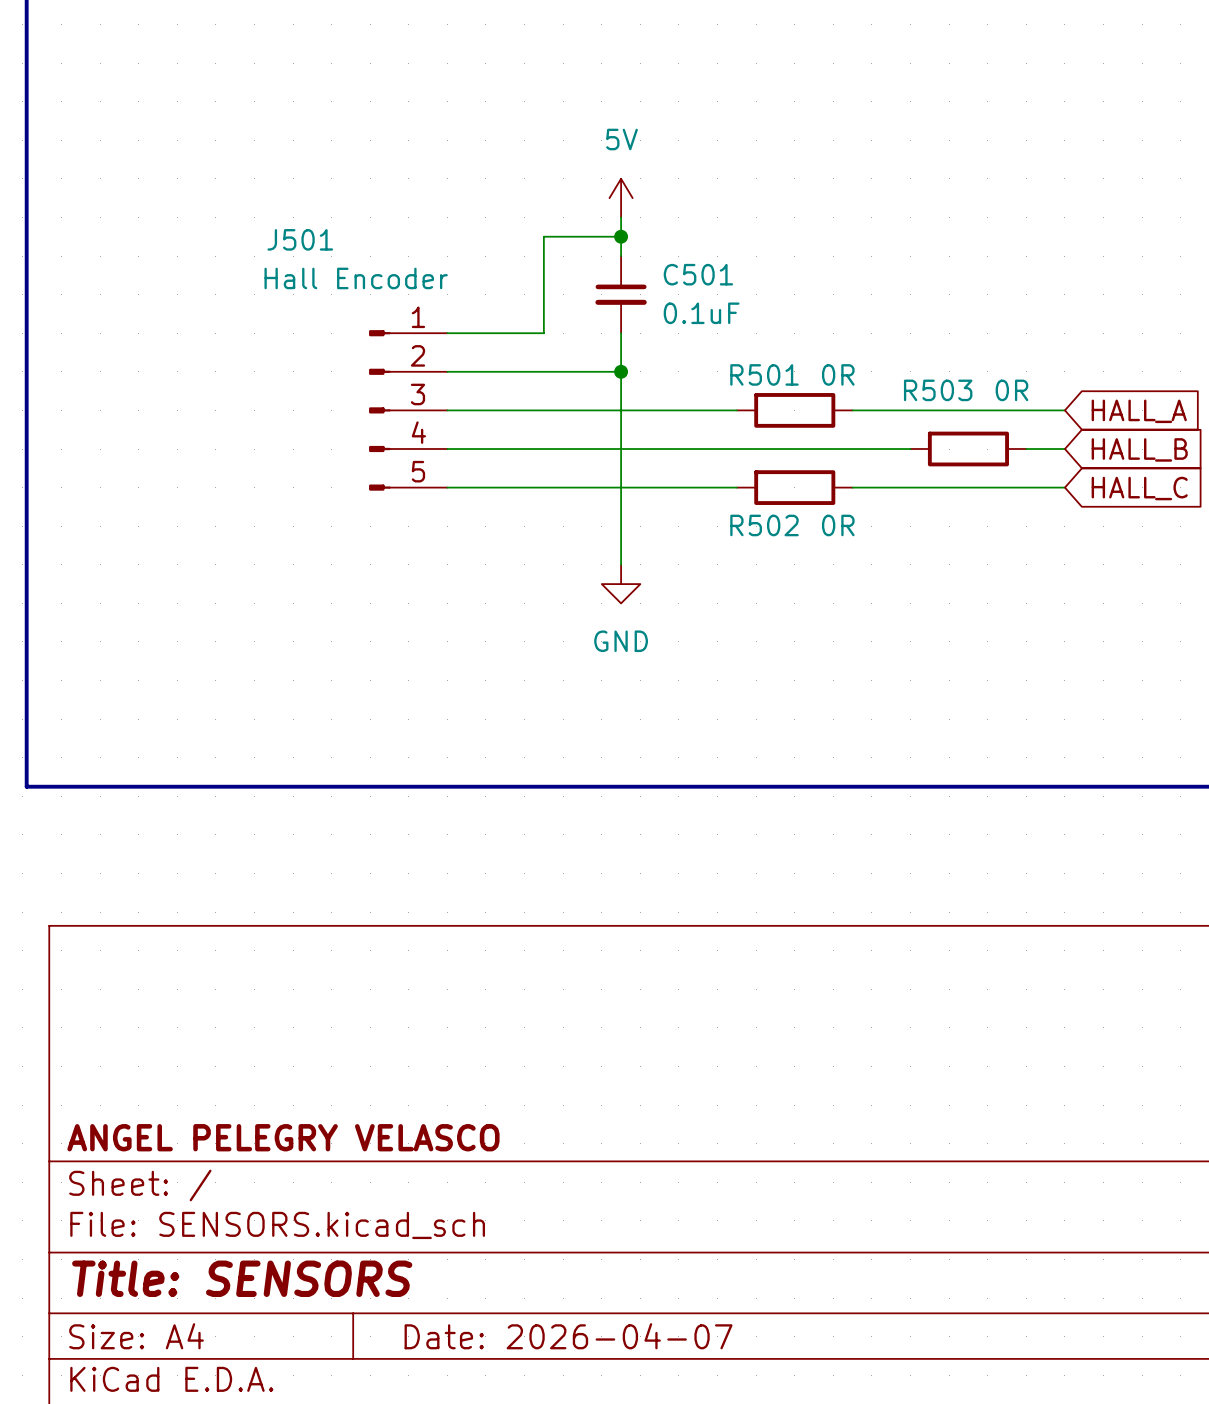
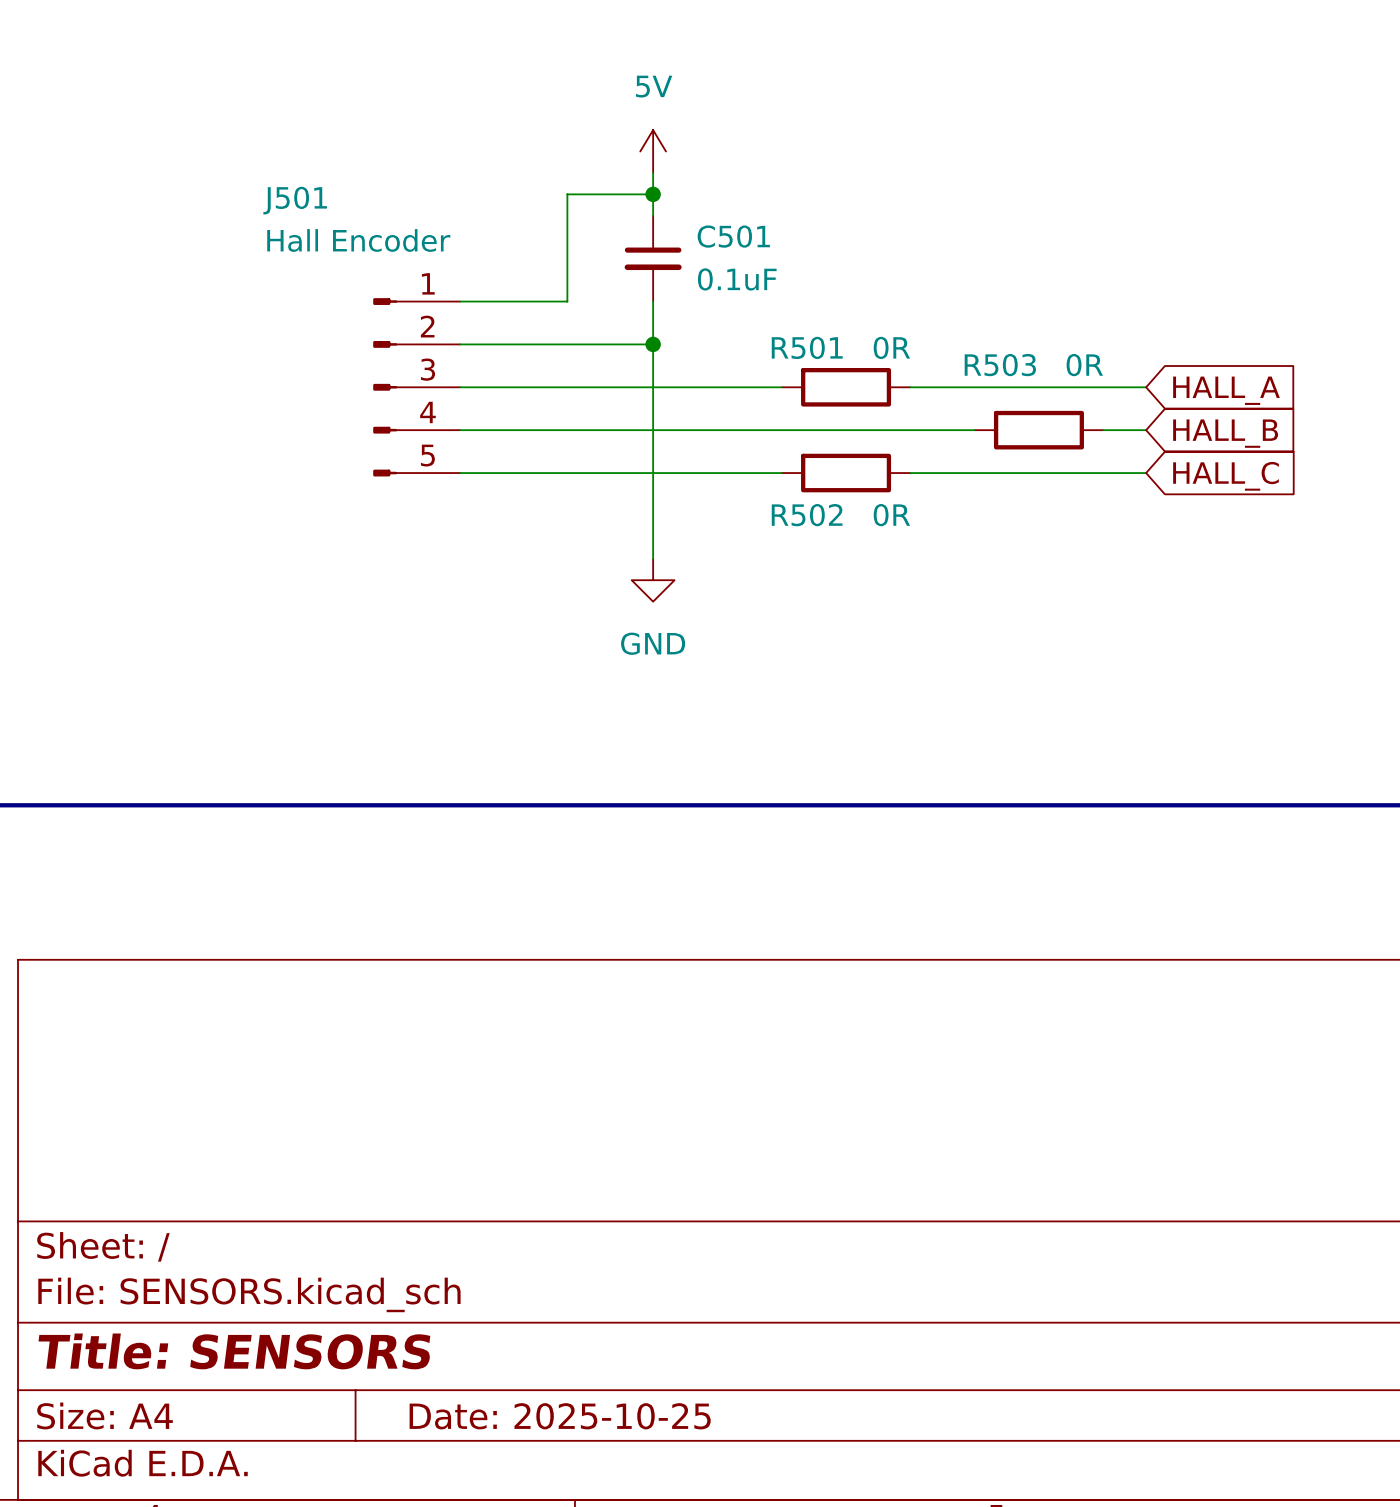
title block: ANGEL PELEGRY VELASCO (283, 1137) -> none
title block: Date: 2026-04-07 (568, 1336) -> Date: 2025-10-25 (560, 1416)

